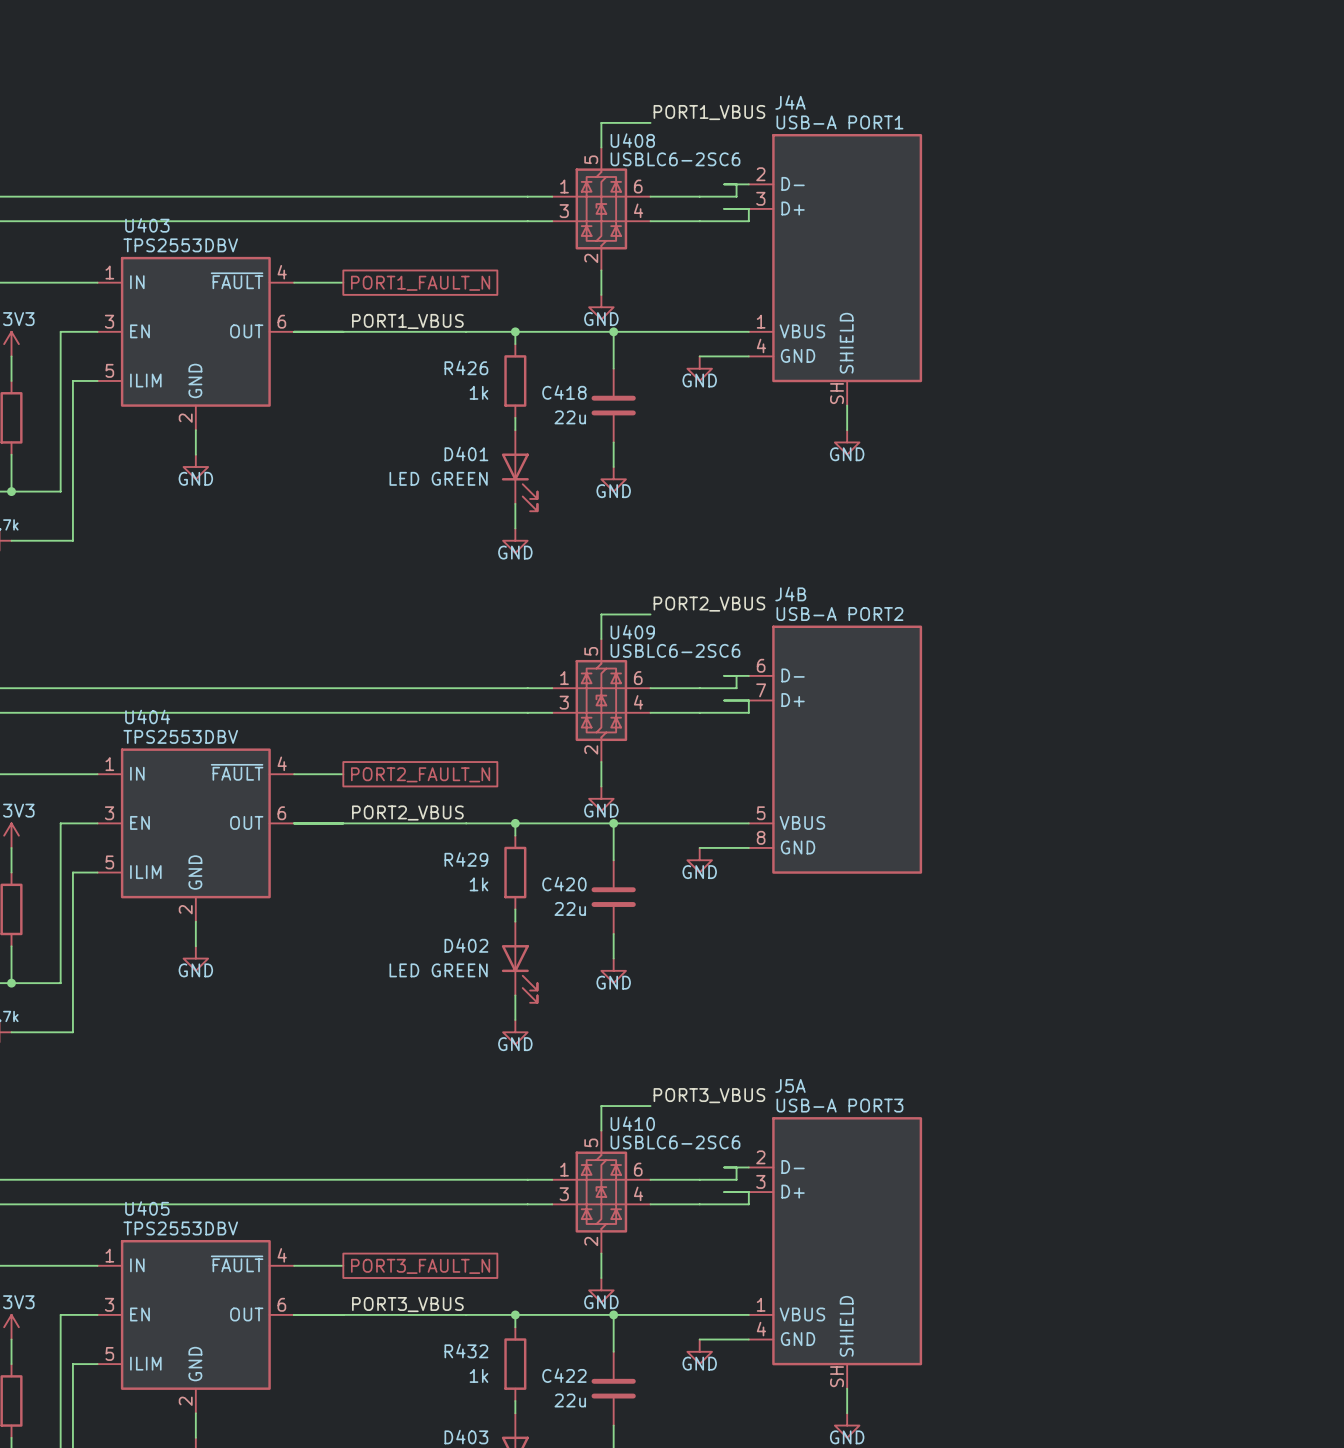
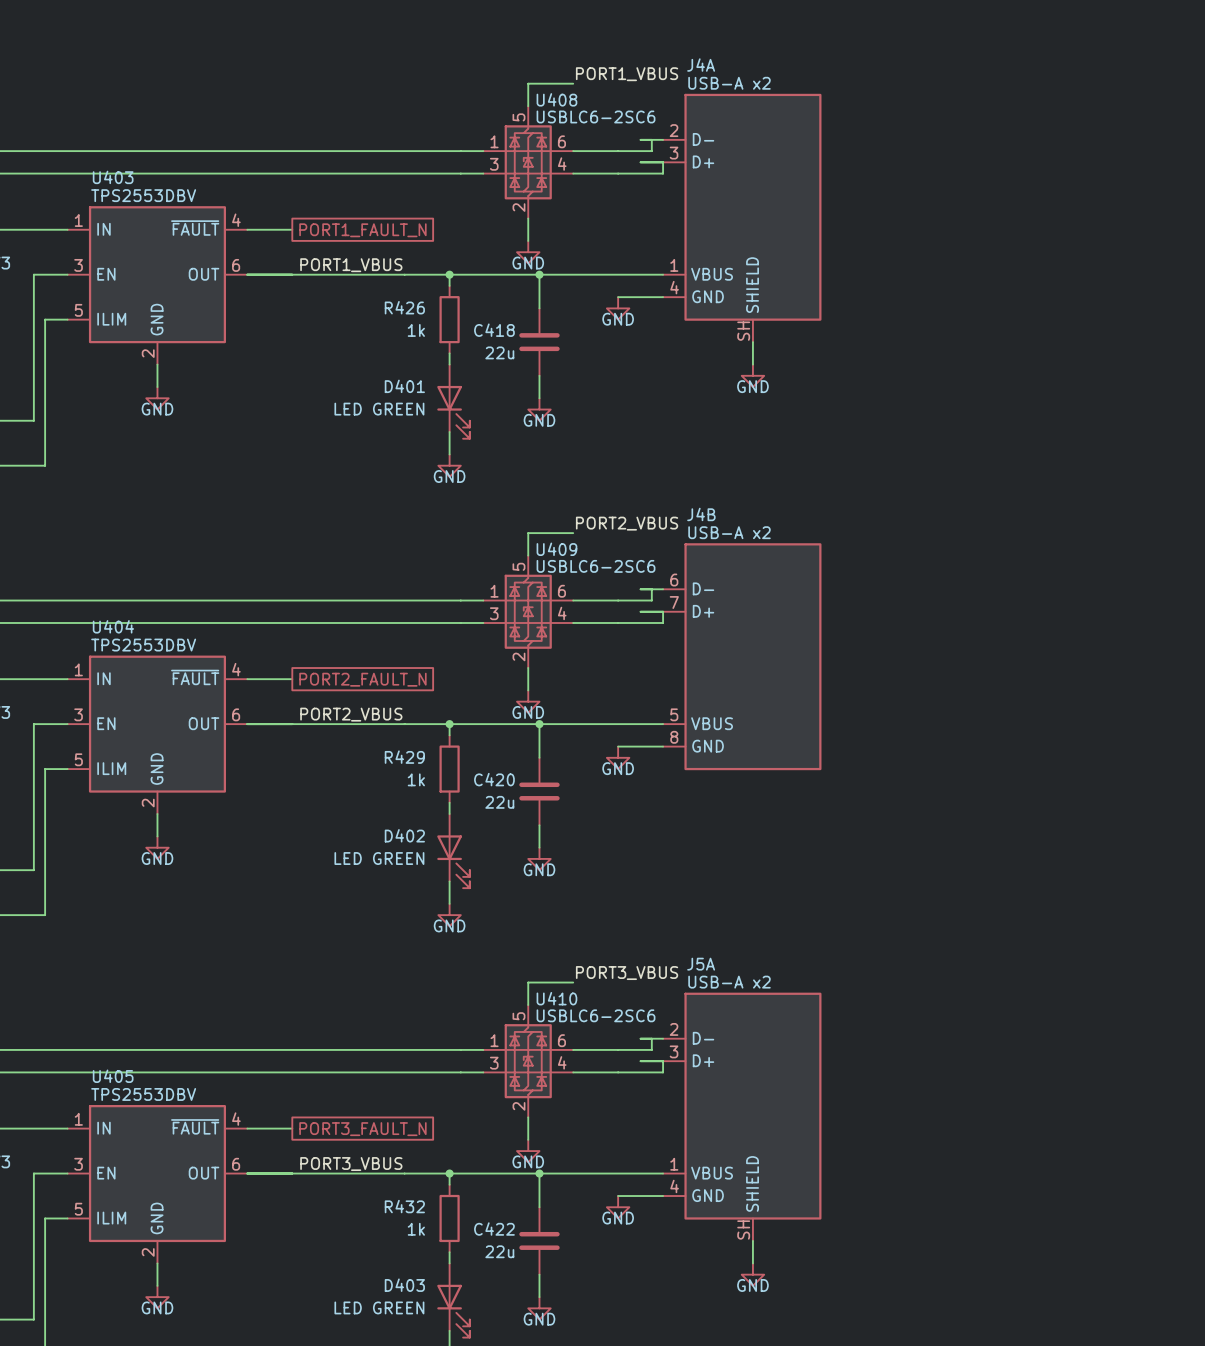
J4A value: USB-A PORT1 (839, 122) -> USB-A x2 (729, 83)
J4B value: USB-A PORT2 (839, 614) -> USB-A x2 (729, 532)
J5A value: USB-A PORT3 (839, 1105) -> USB-A x2 (729, 982)

